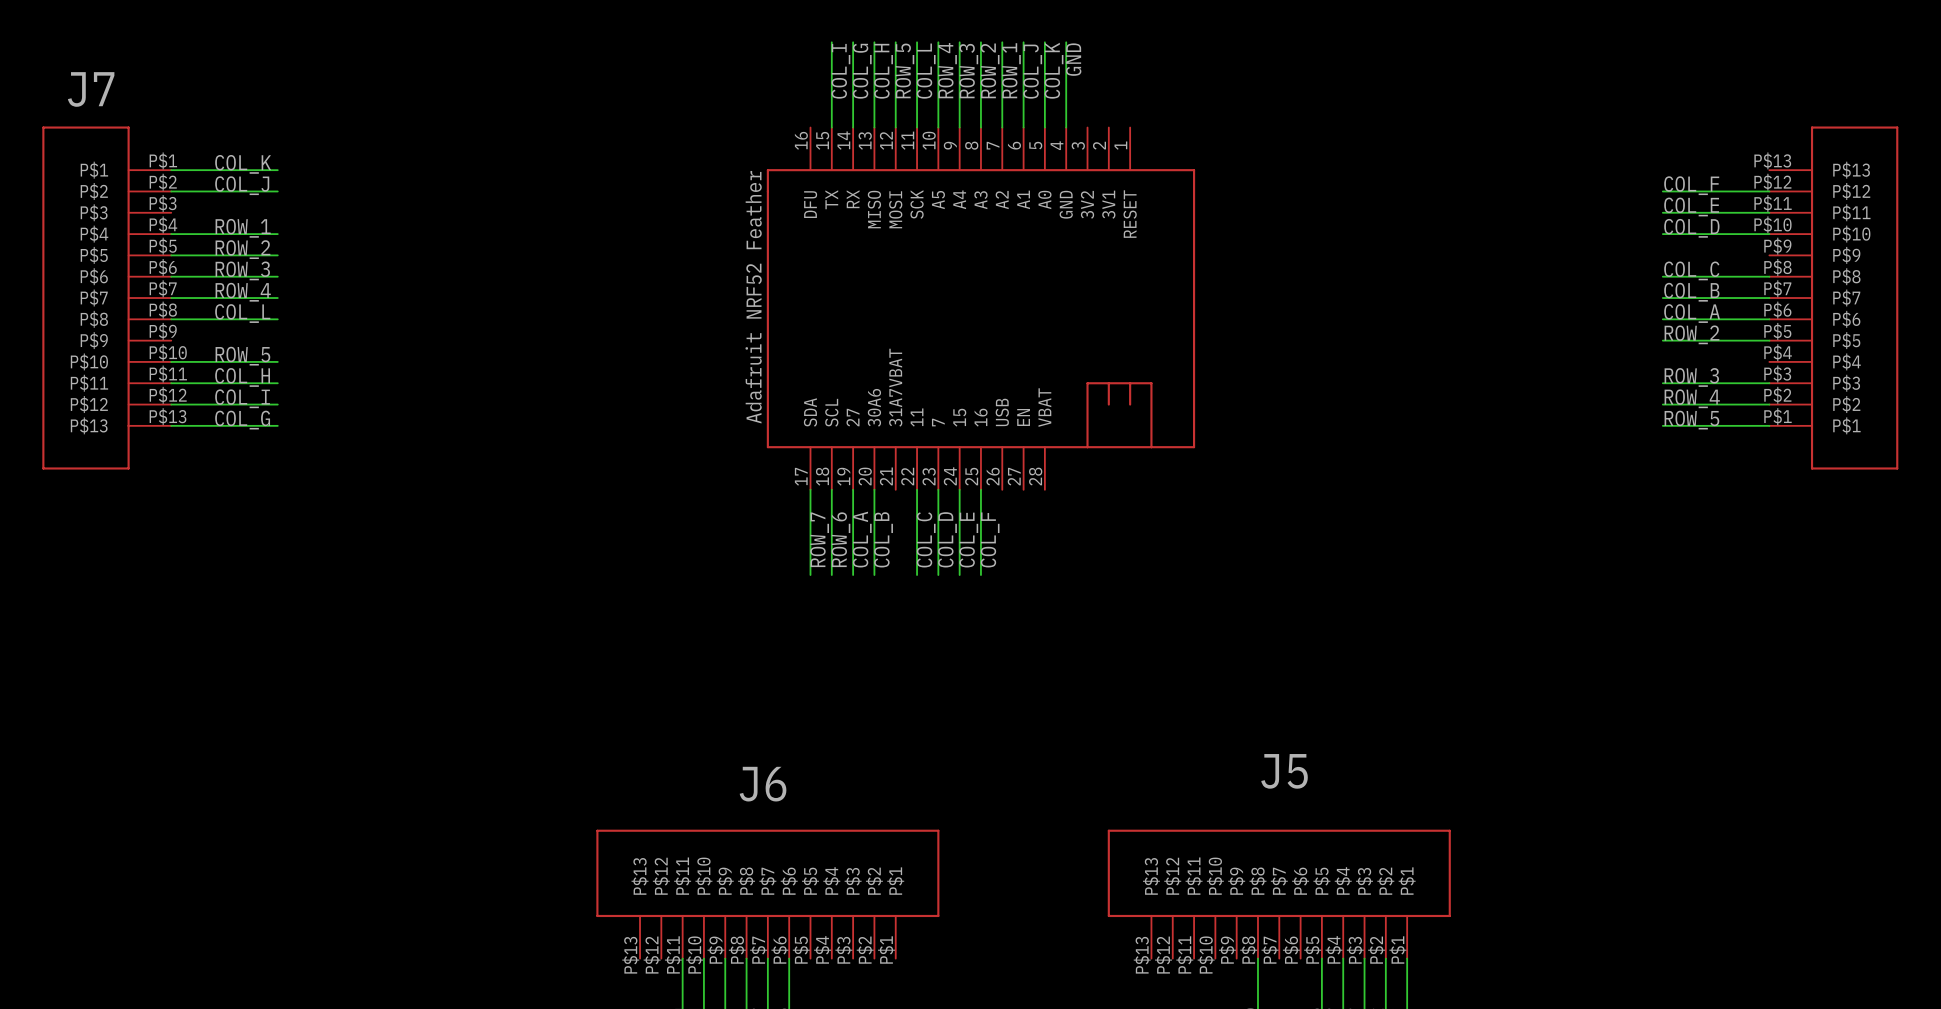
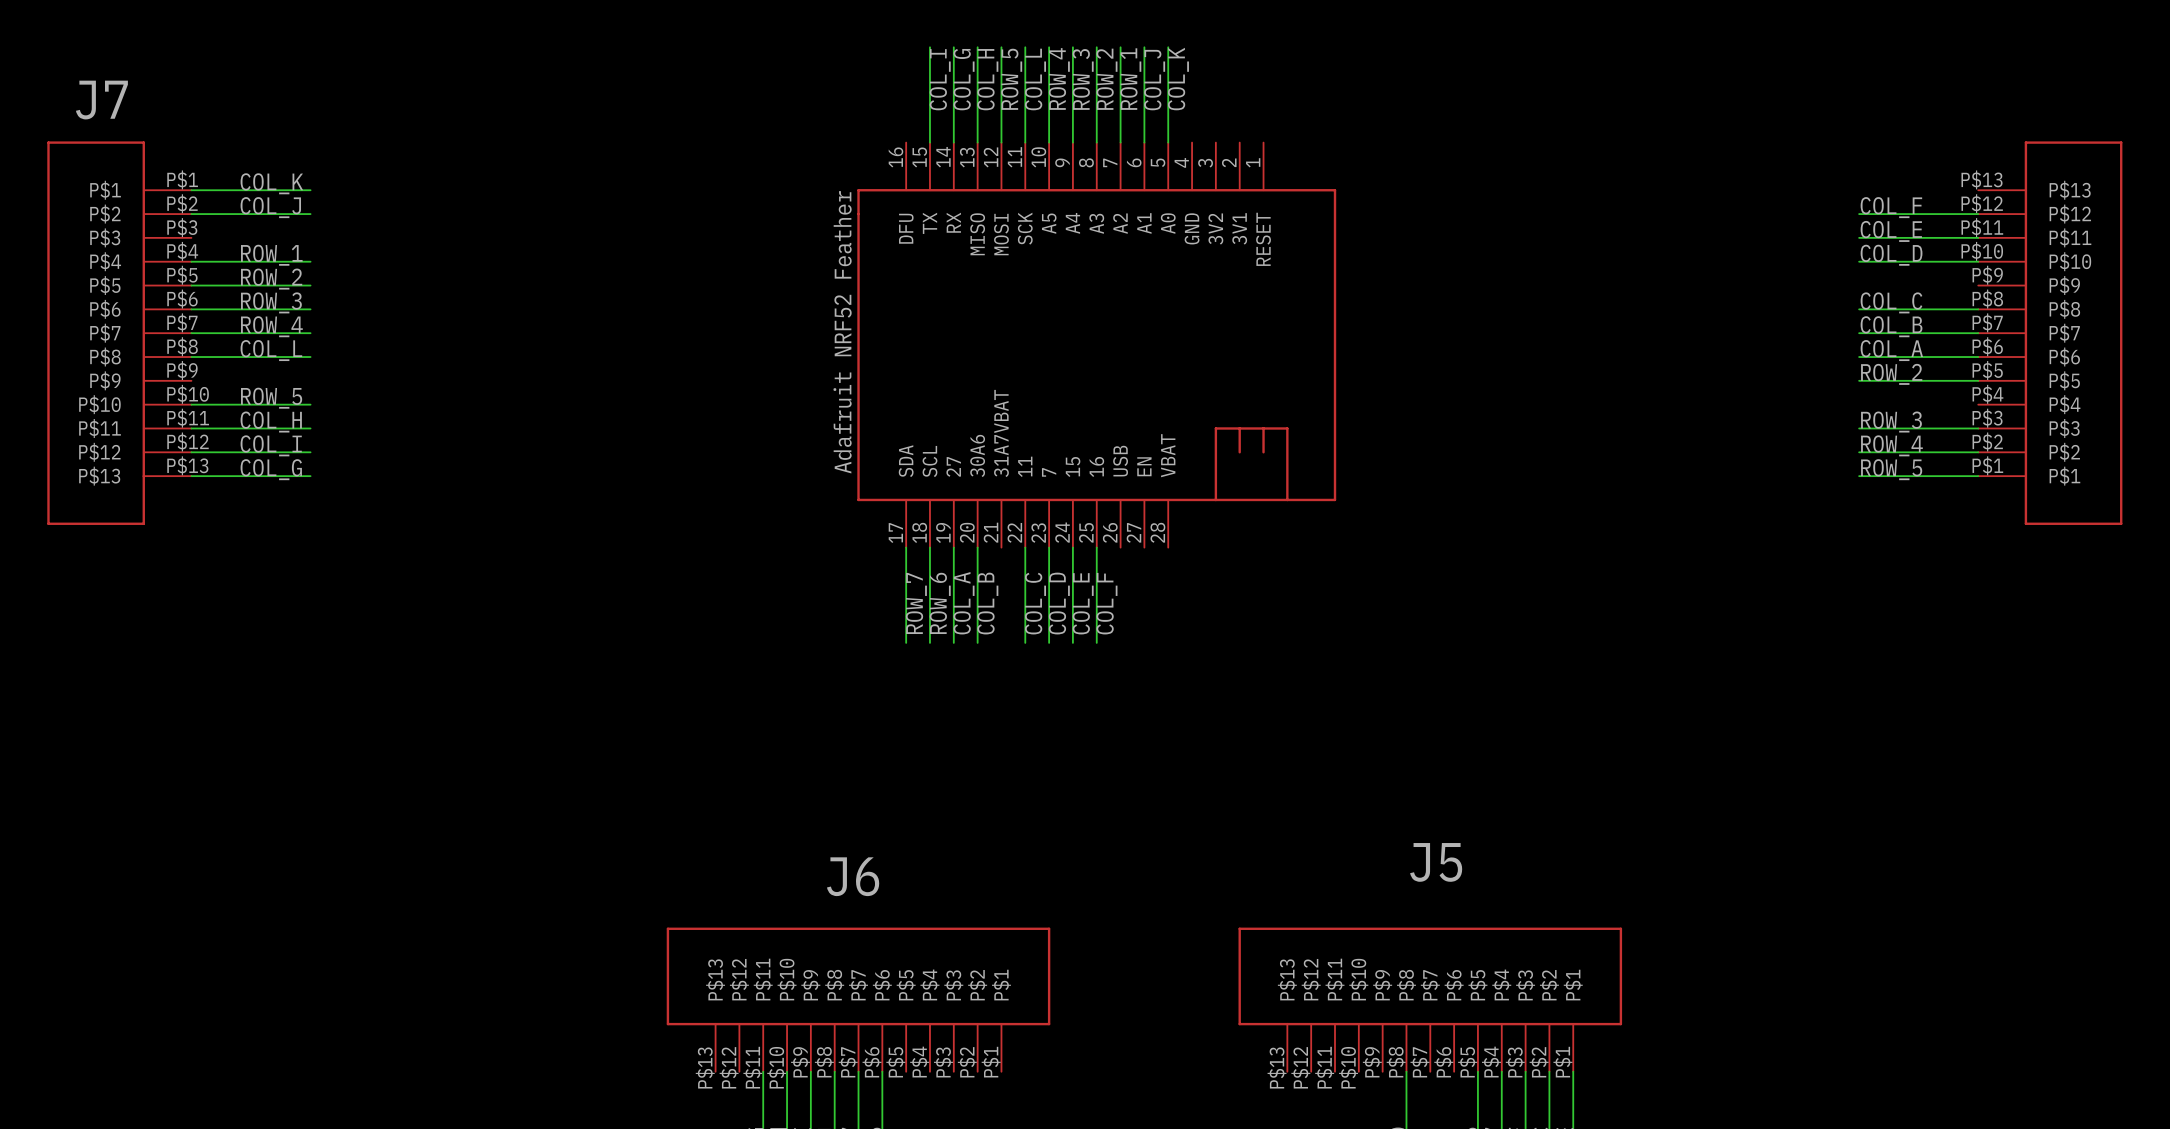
wire: (1066, 42) (1066, 127) -> none
label: GND (1073, 59) -> none

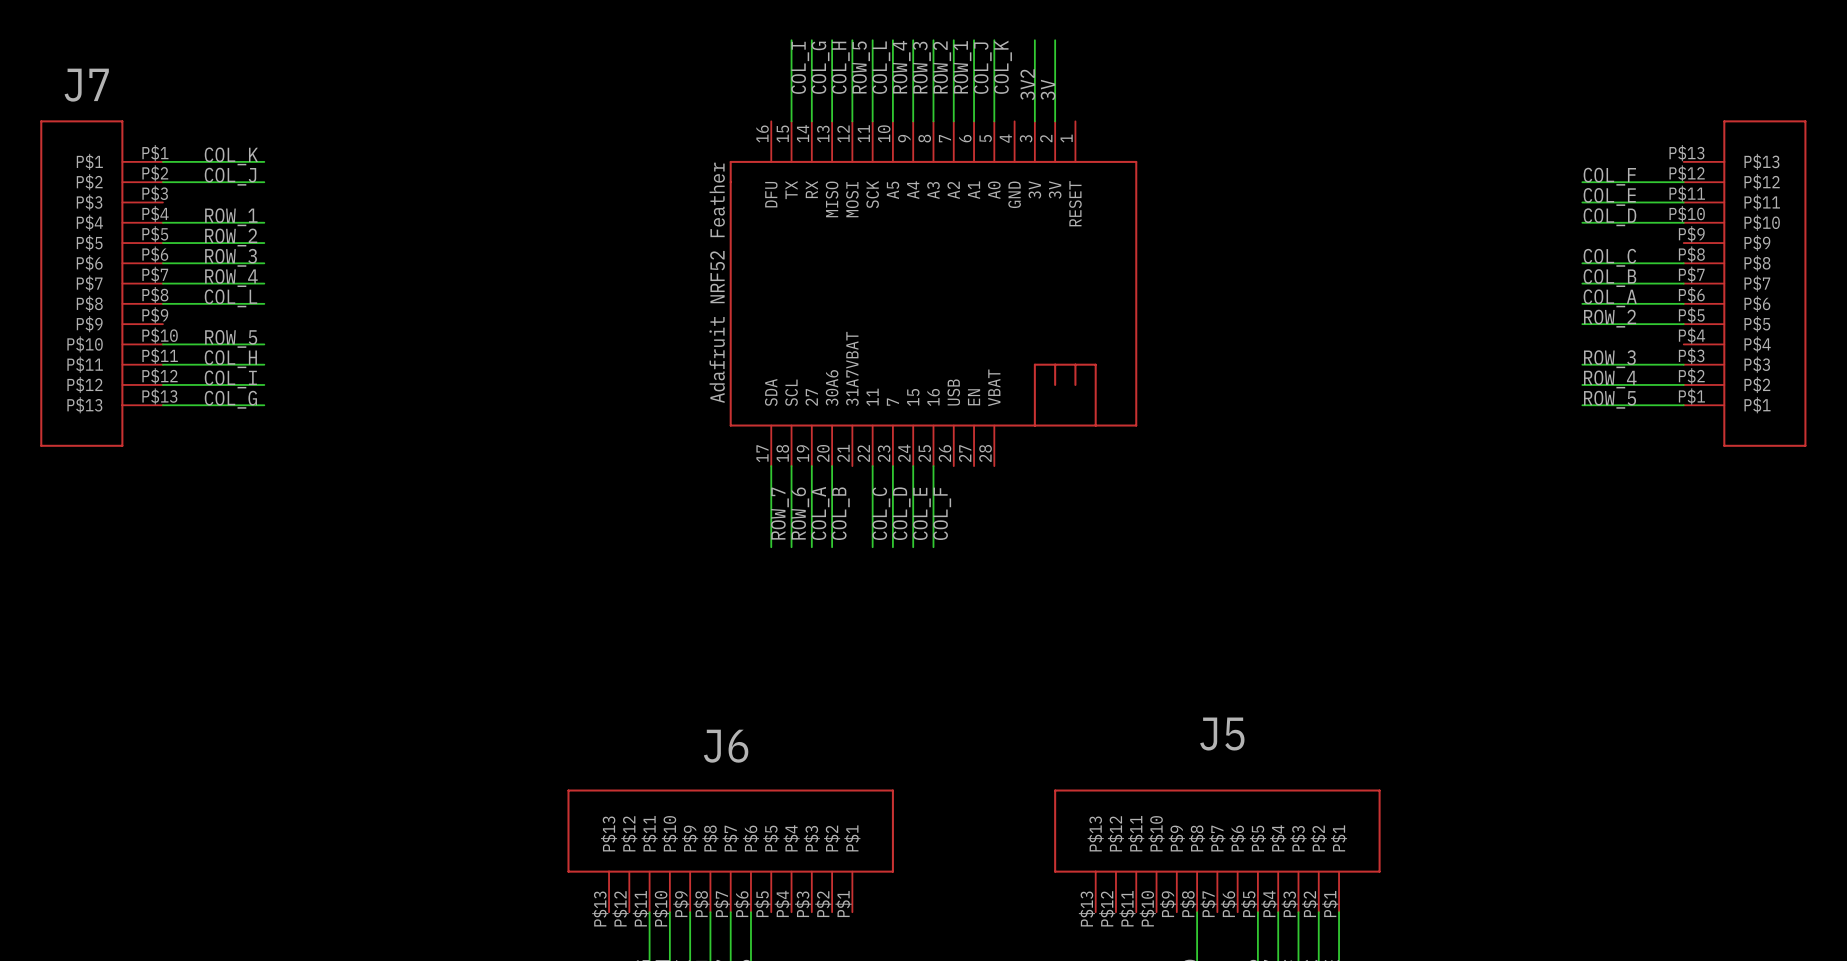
wire: none -> (1034, 40) (1034, 121)
wire: none -> (1055, 40) (1055, 121)
label: none -> 3V2 (1027, 84)
label: none -> 3V (1048, 89)
part pin name: 3V1 (1239, 228) -> 3V (1055, 190)
part pin name: 3V2 (1215, 229) -> 3V (1034, 190)

